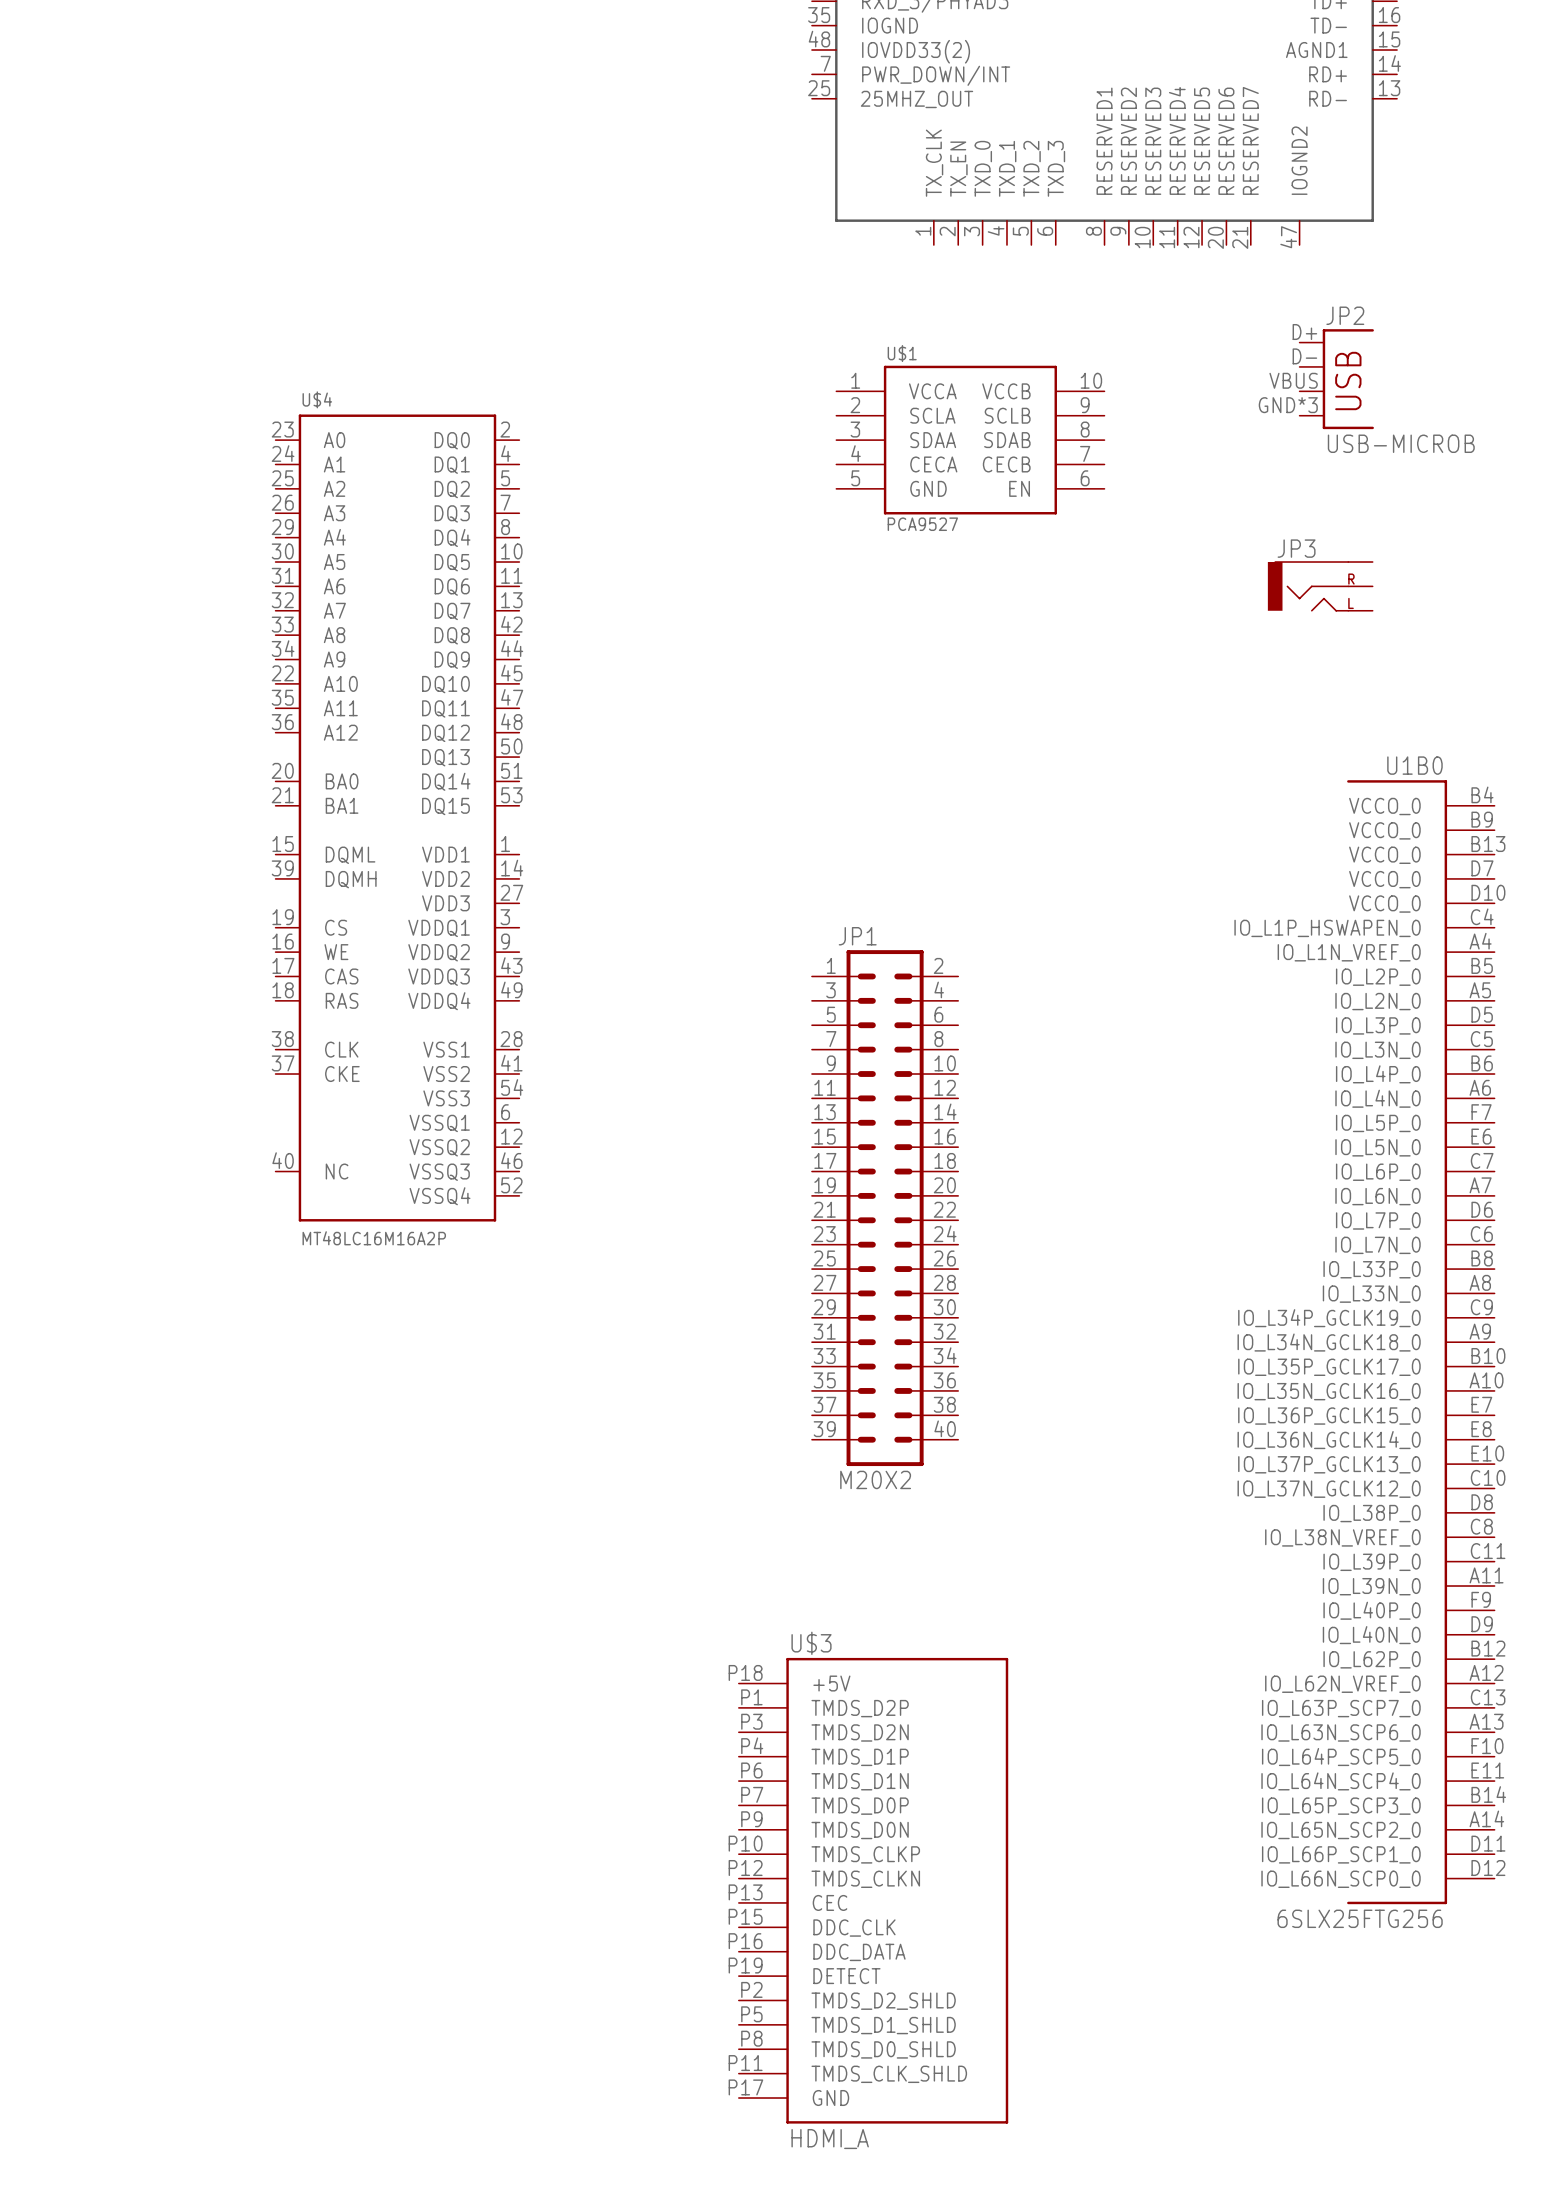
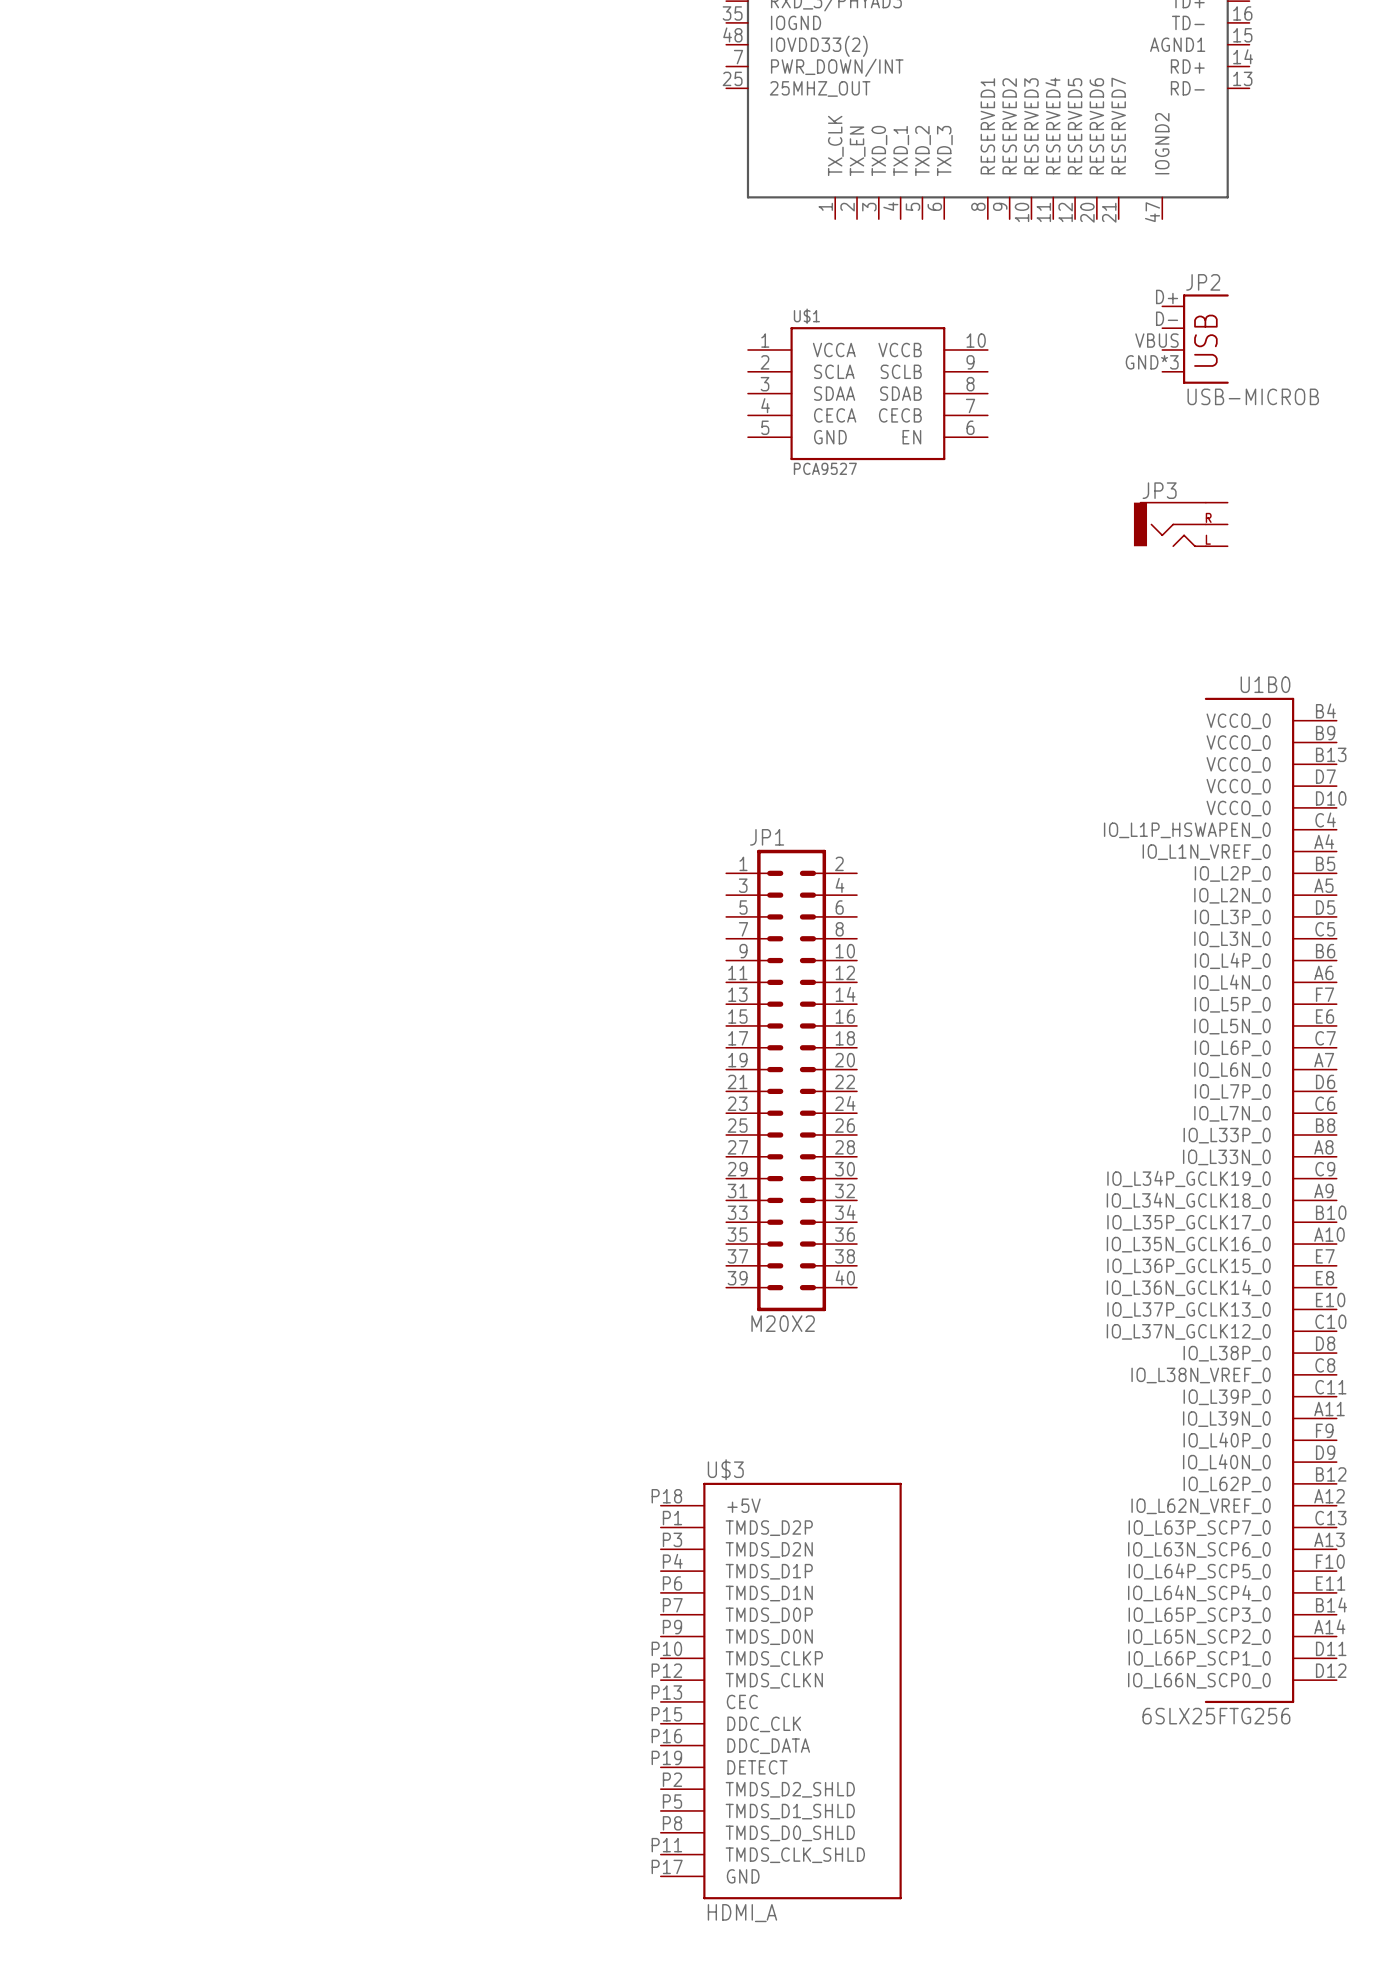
U$4: MT48LC16M16A2P (397, 818) -> none

